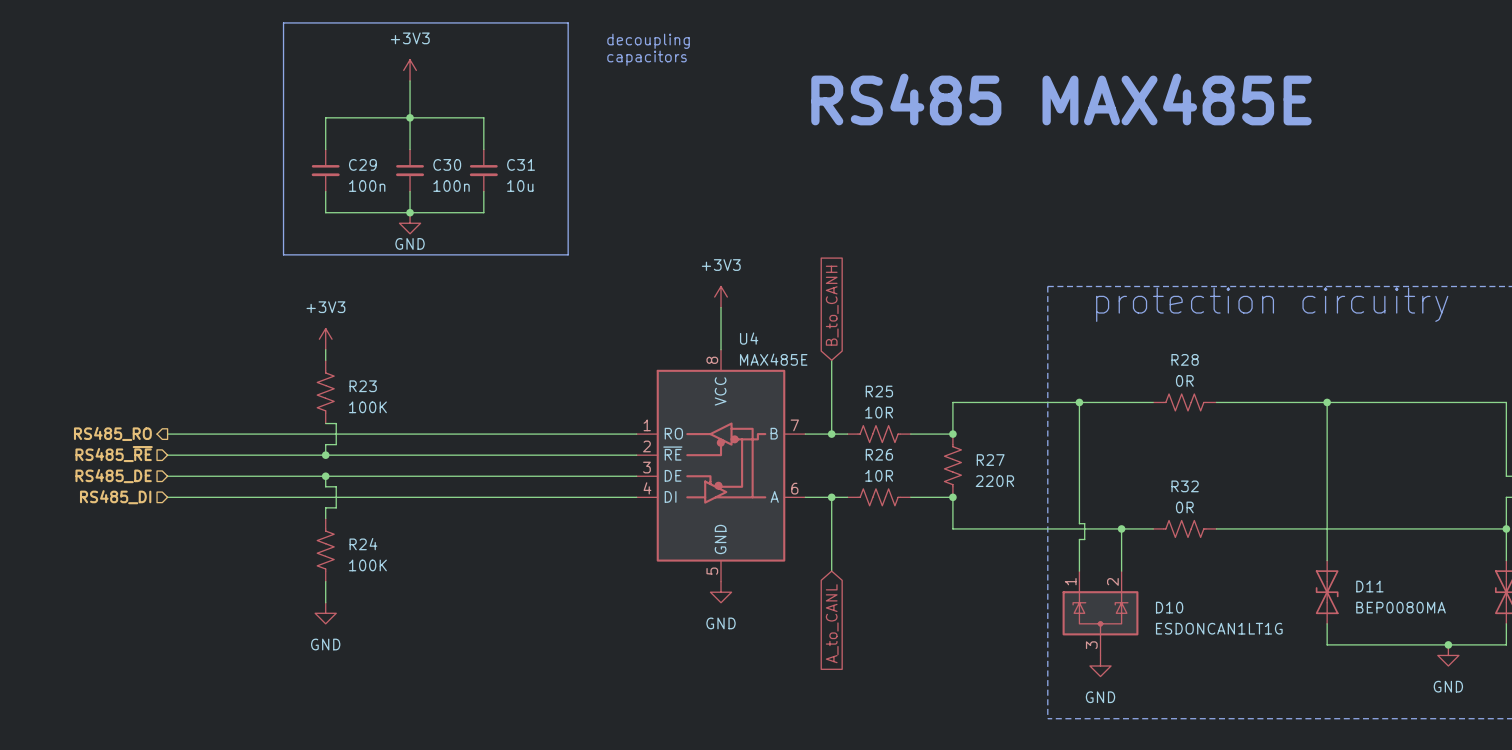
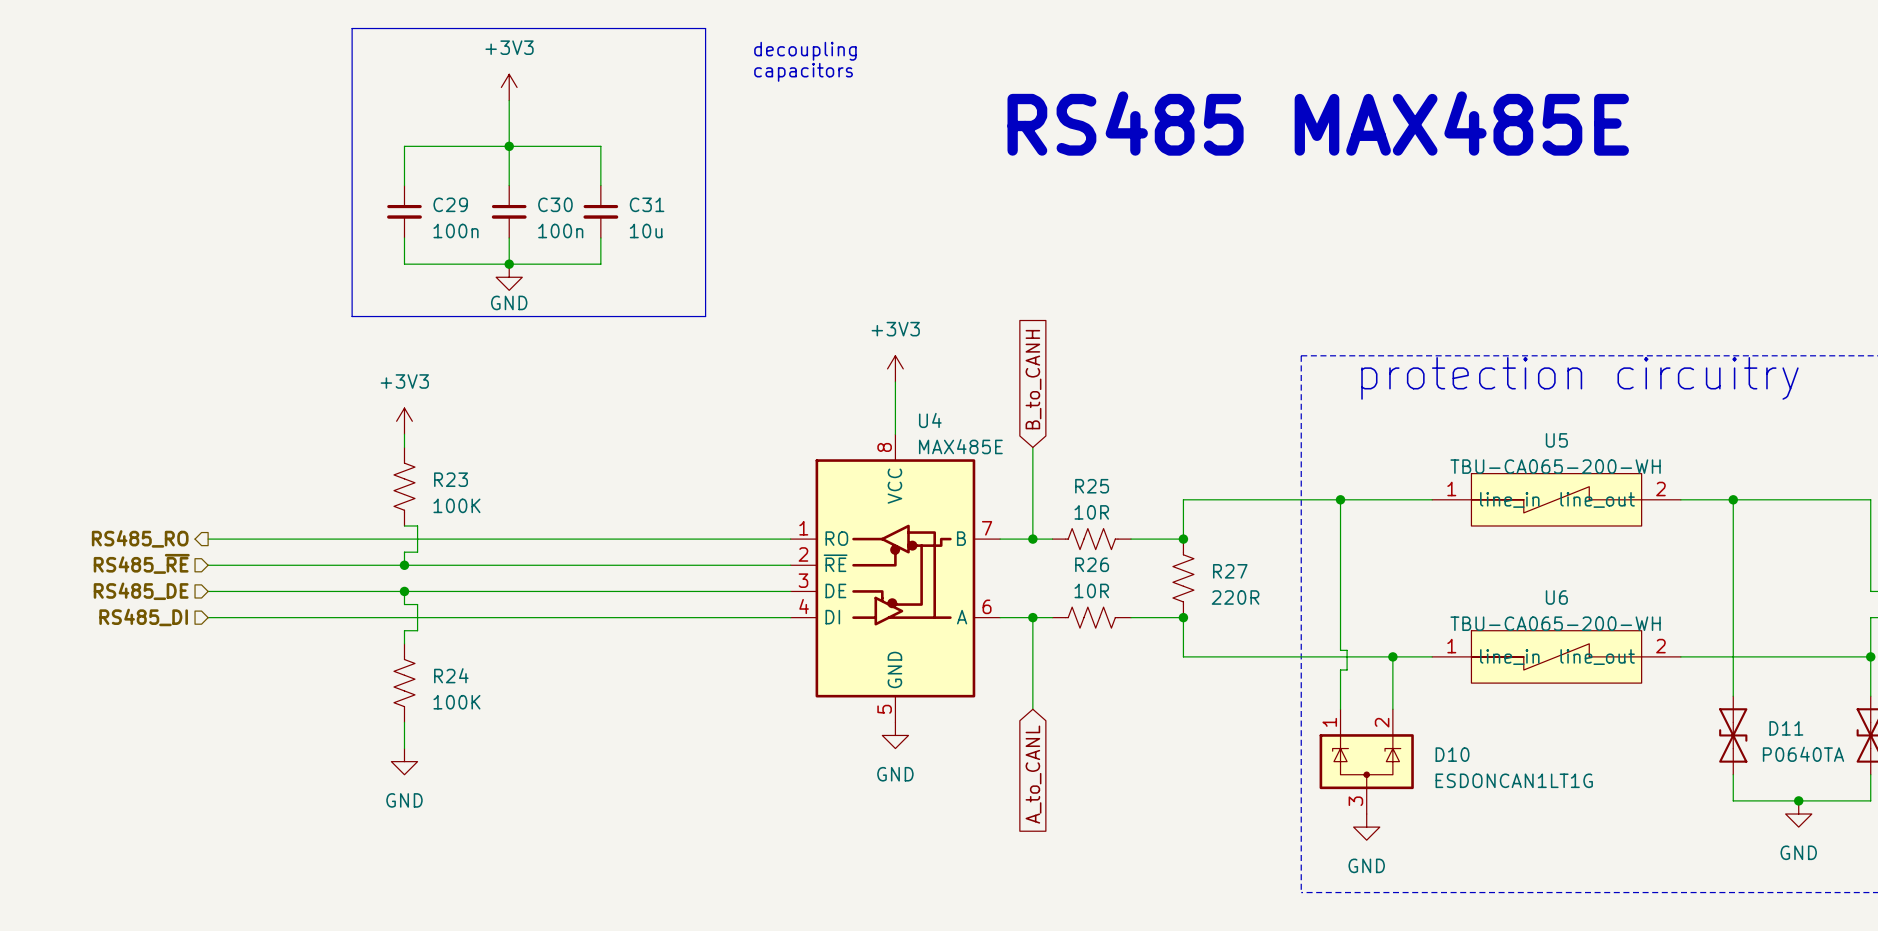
R28: 0R (1184, 402) -> none
U5: none -> TBU-CA065-200-WH (1556, 499)
wire: (1327, 402) (1327, 560) -> (1733, 499) (1733, 696)
junction: (1327, 402) -> none
junction: none -> (1733, 499)
R32: 0R (1184, 528) -> none
U6: none -> TBU-CA065-200-WH (1556, 656)
D11 position: (1327, 592) -> (1733, 735)
D11 value: BEP0080MA (1401, 607) -> P0640TA (1803, 754)
wire: (1327, 623) (1327, 644) (1395, 644) -> (1733, 774) (1733, 800)

